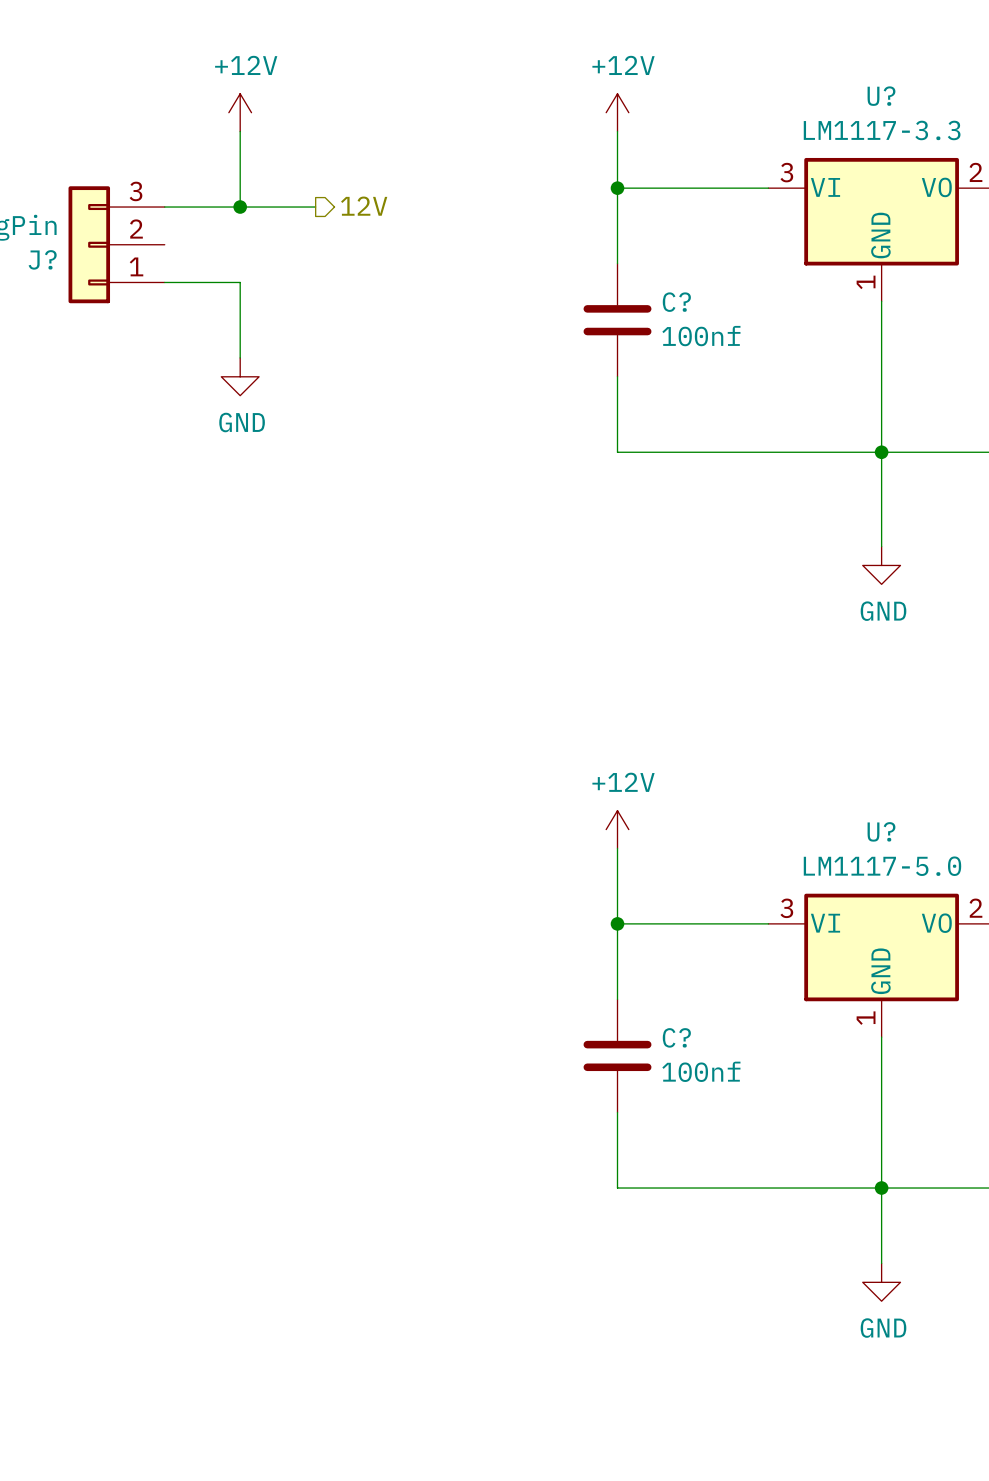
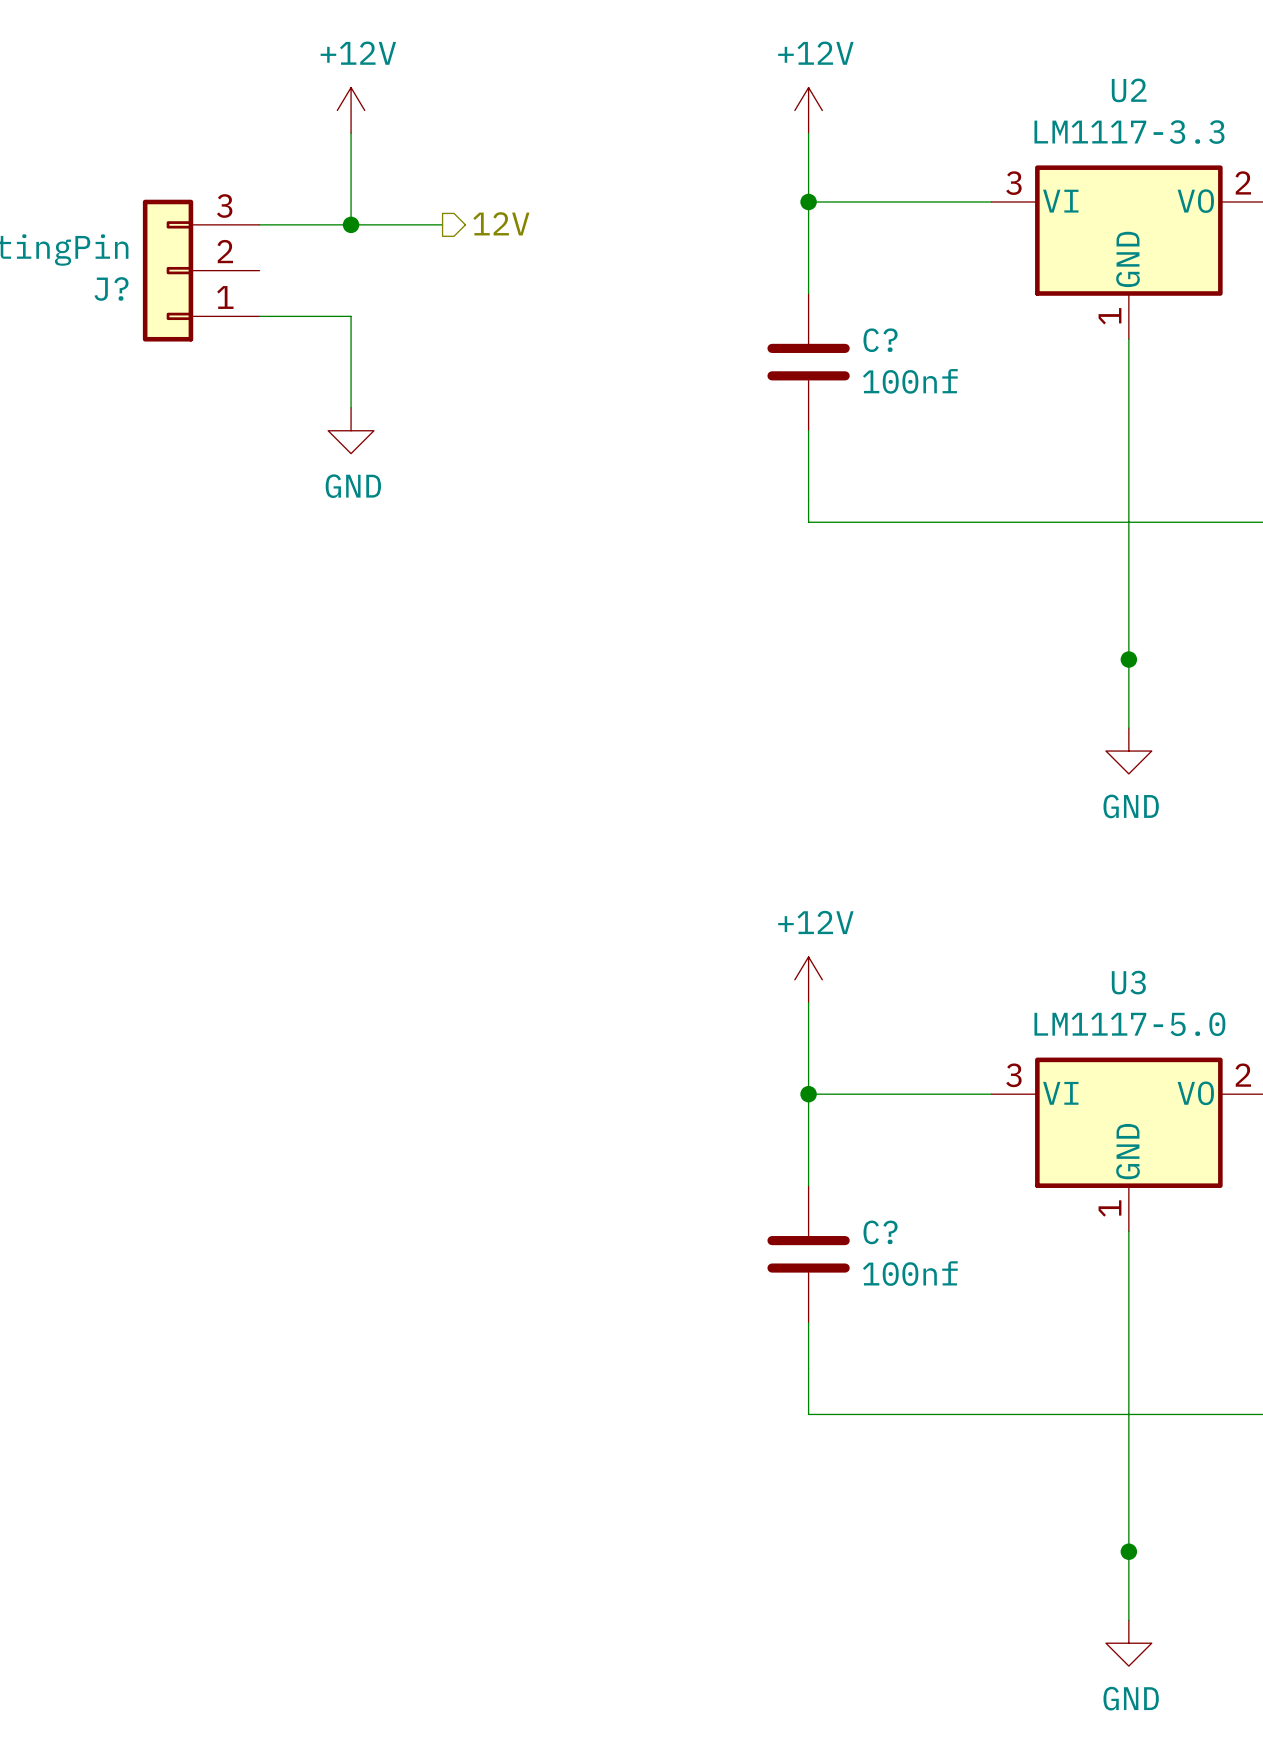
U? name: U? (881, 96) -> U2 (1129, 90)
junction: (881, 452) -> none
wire: none -> (1128, 636) (1128, 728)
power symbol position: GND (881, 565) -> GND (1128, 751)
junction: none -> (1128, 659)
U? name: U? (881, 831) -> U3 (1128, 982)
junction: (881, 1188) -> none
wire: none -> (1128, 1505) (1128, 1620)
power symbol position: GND (881, 1282) -> GND (1128, 1643)
junction: none -> (1128, 1551)

